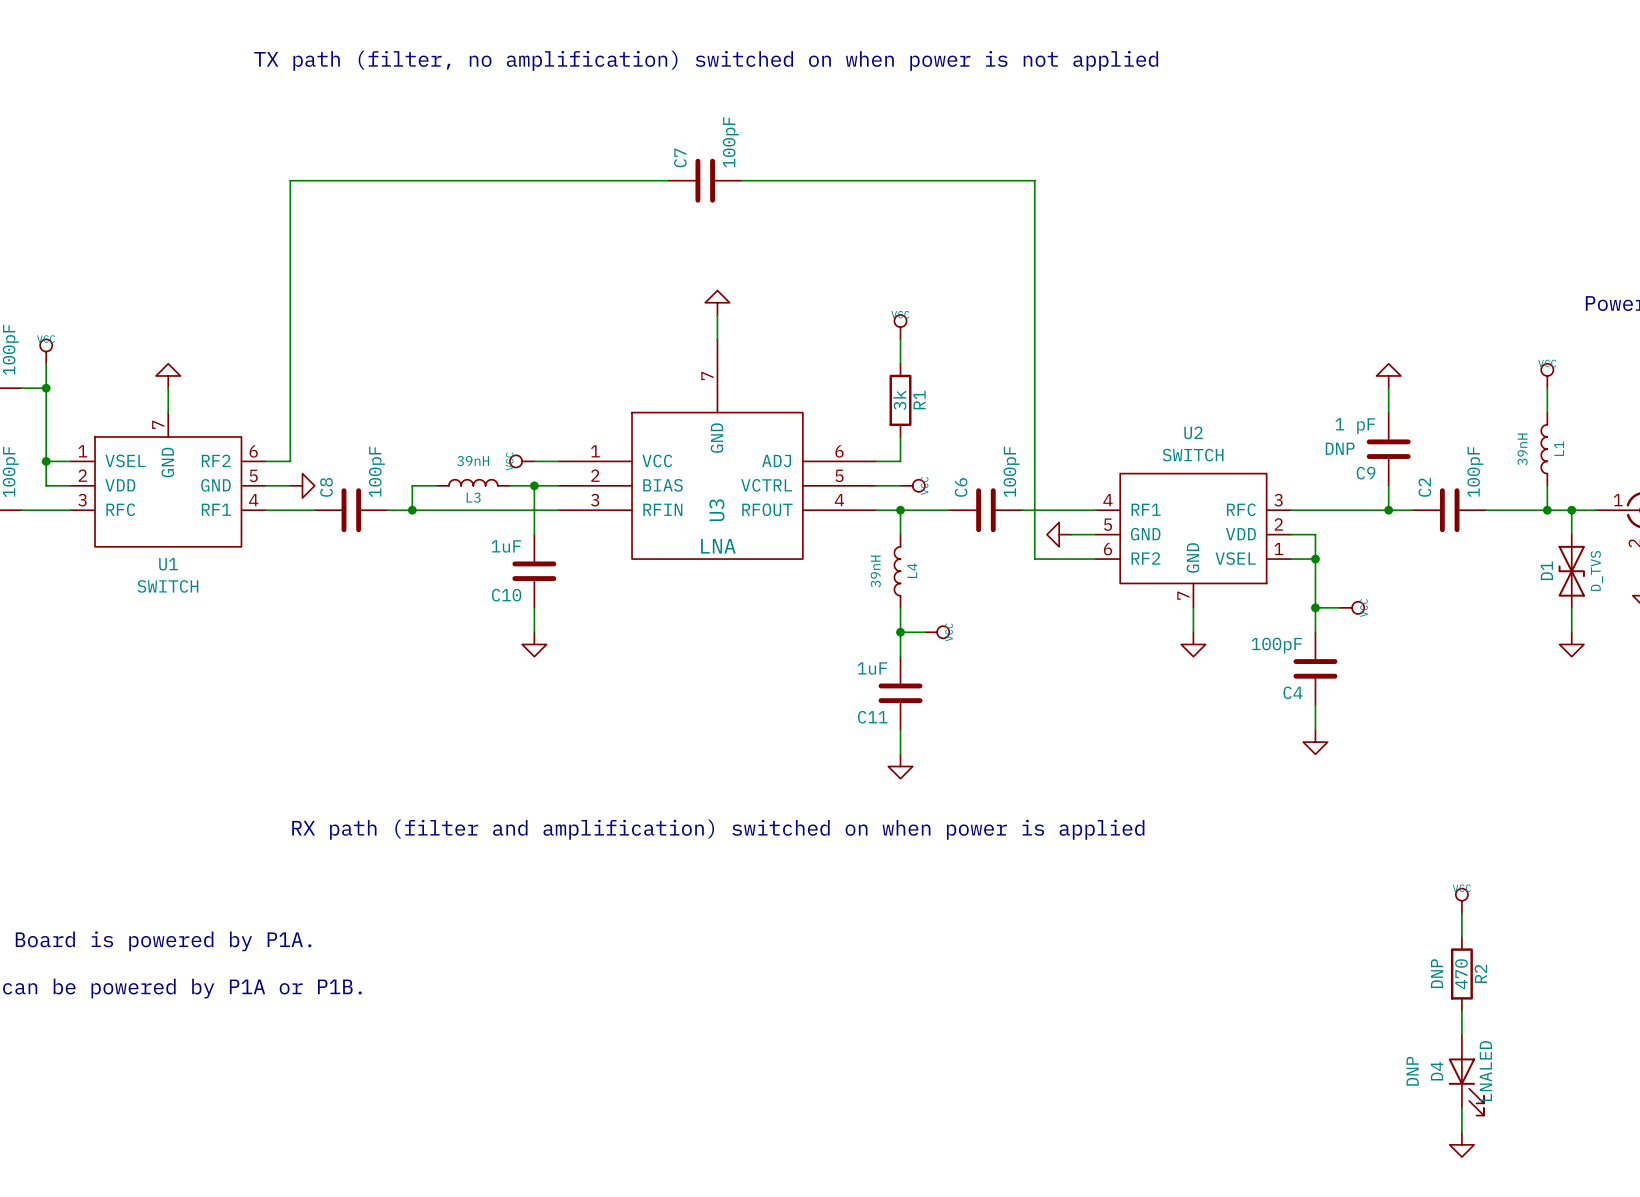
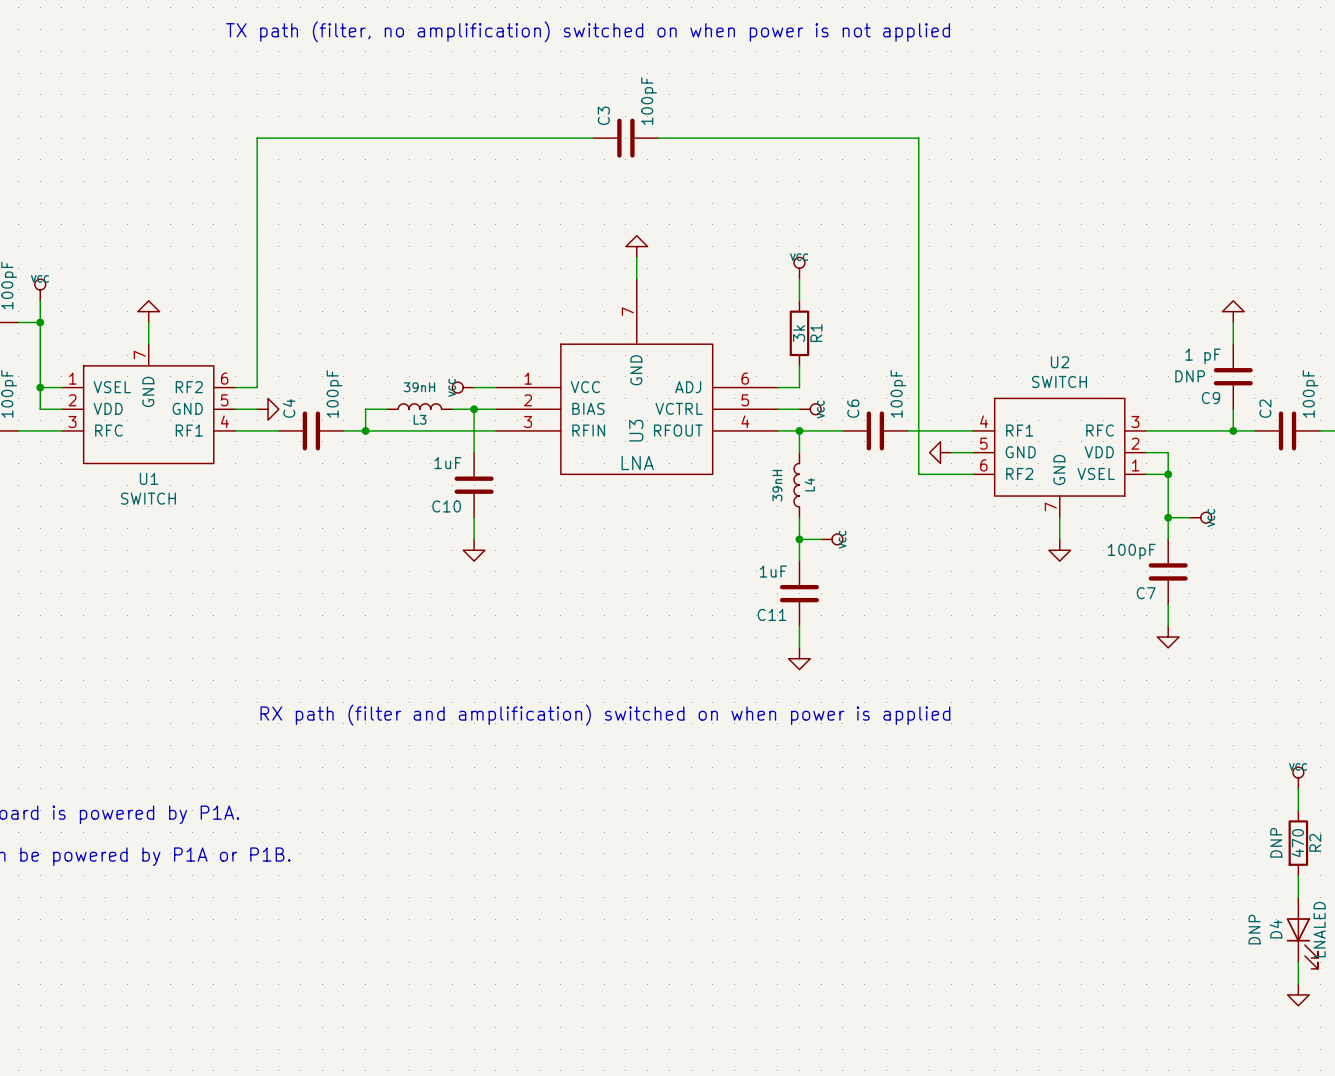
C7 name: C7 (680, 158) -> C3 (603, 115)
C8 name: C8 (326, 487) -> C4 (289, 408)
C4 name: C4 (1293, 692) -> C7 (1146, 593)

